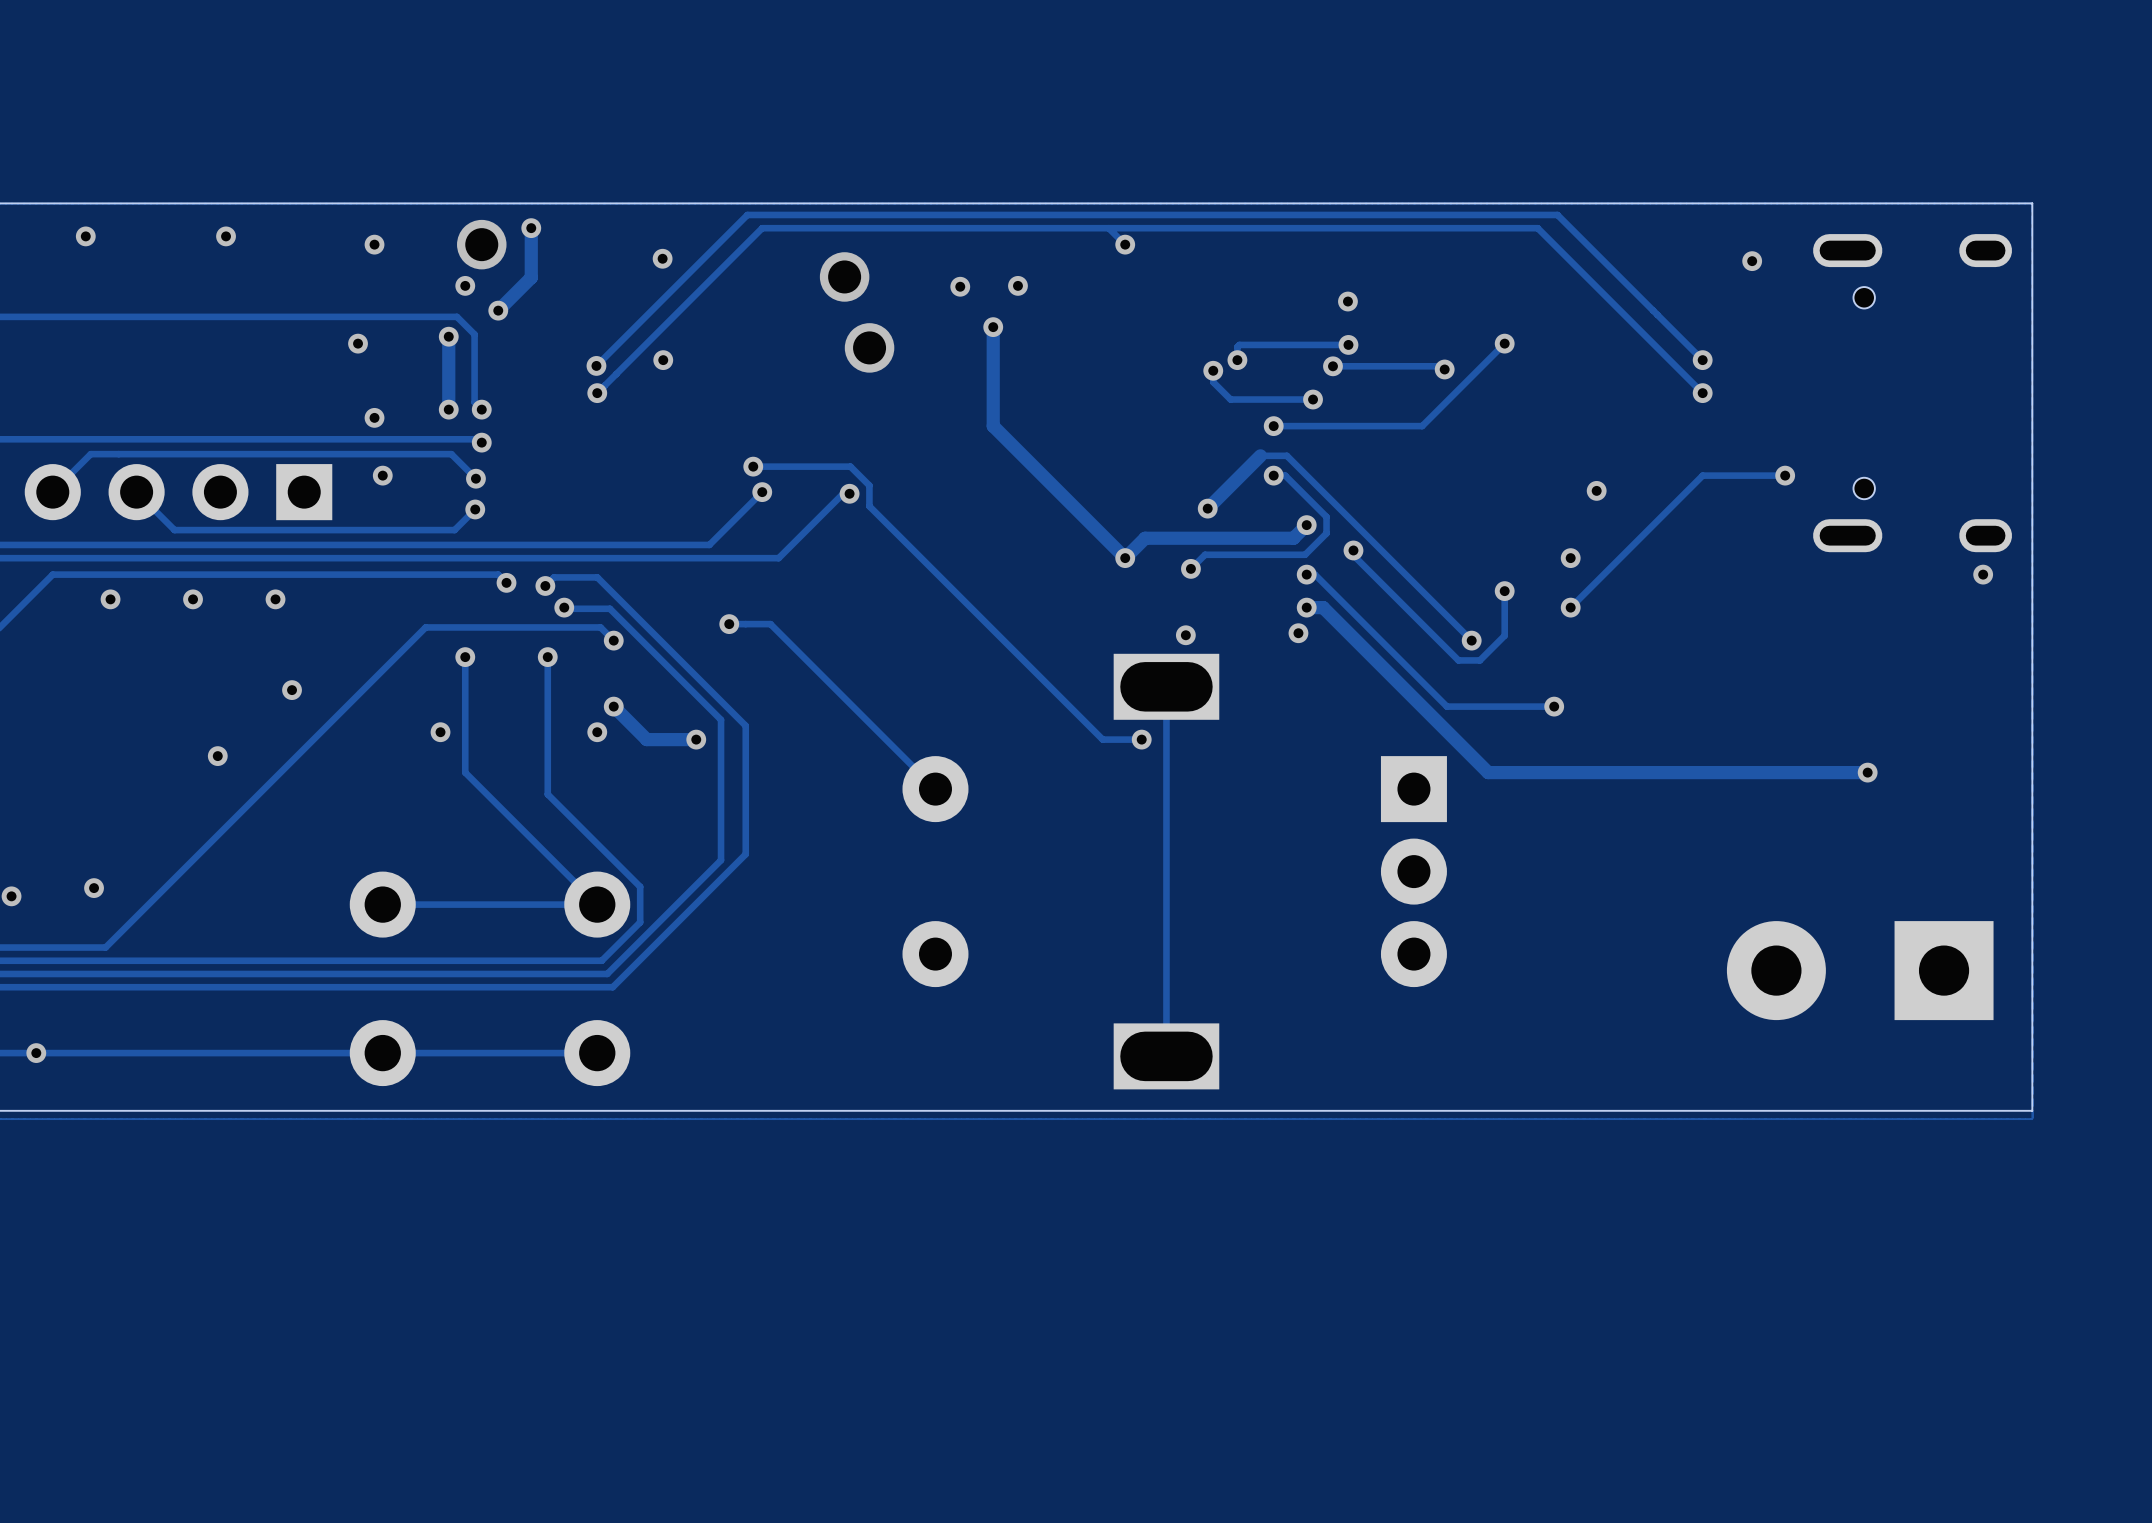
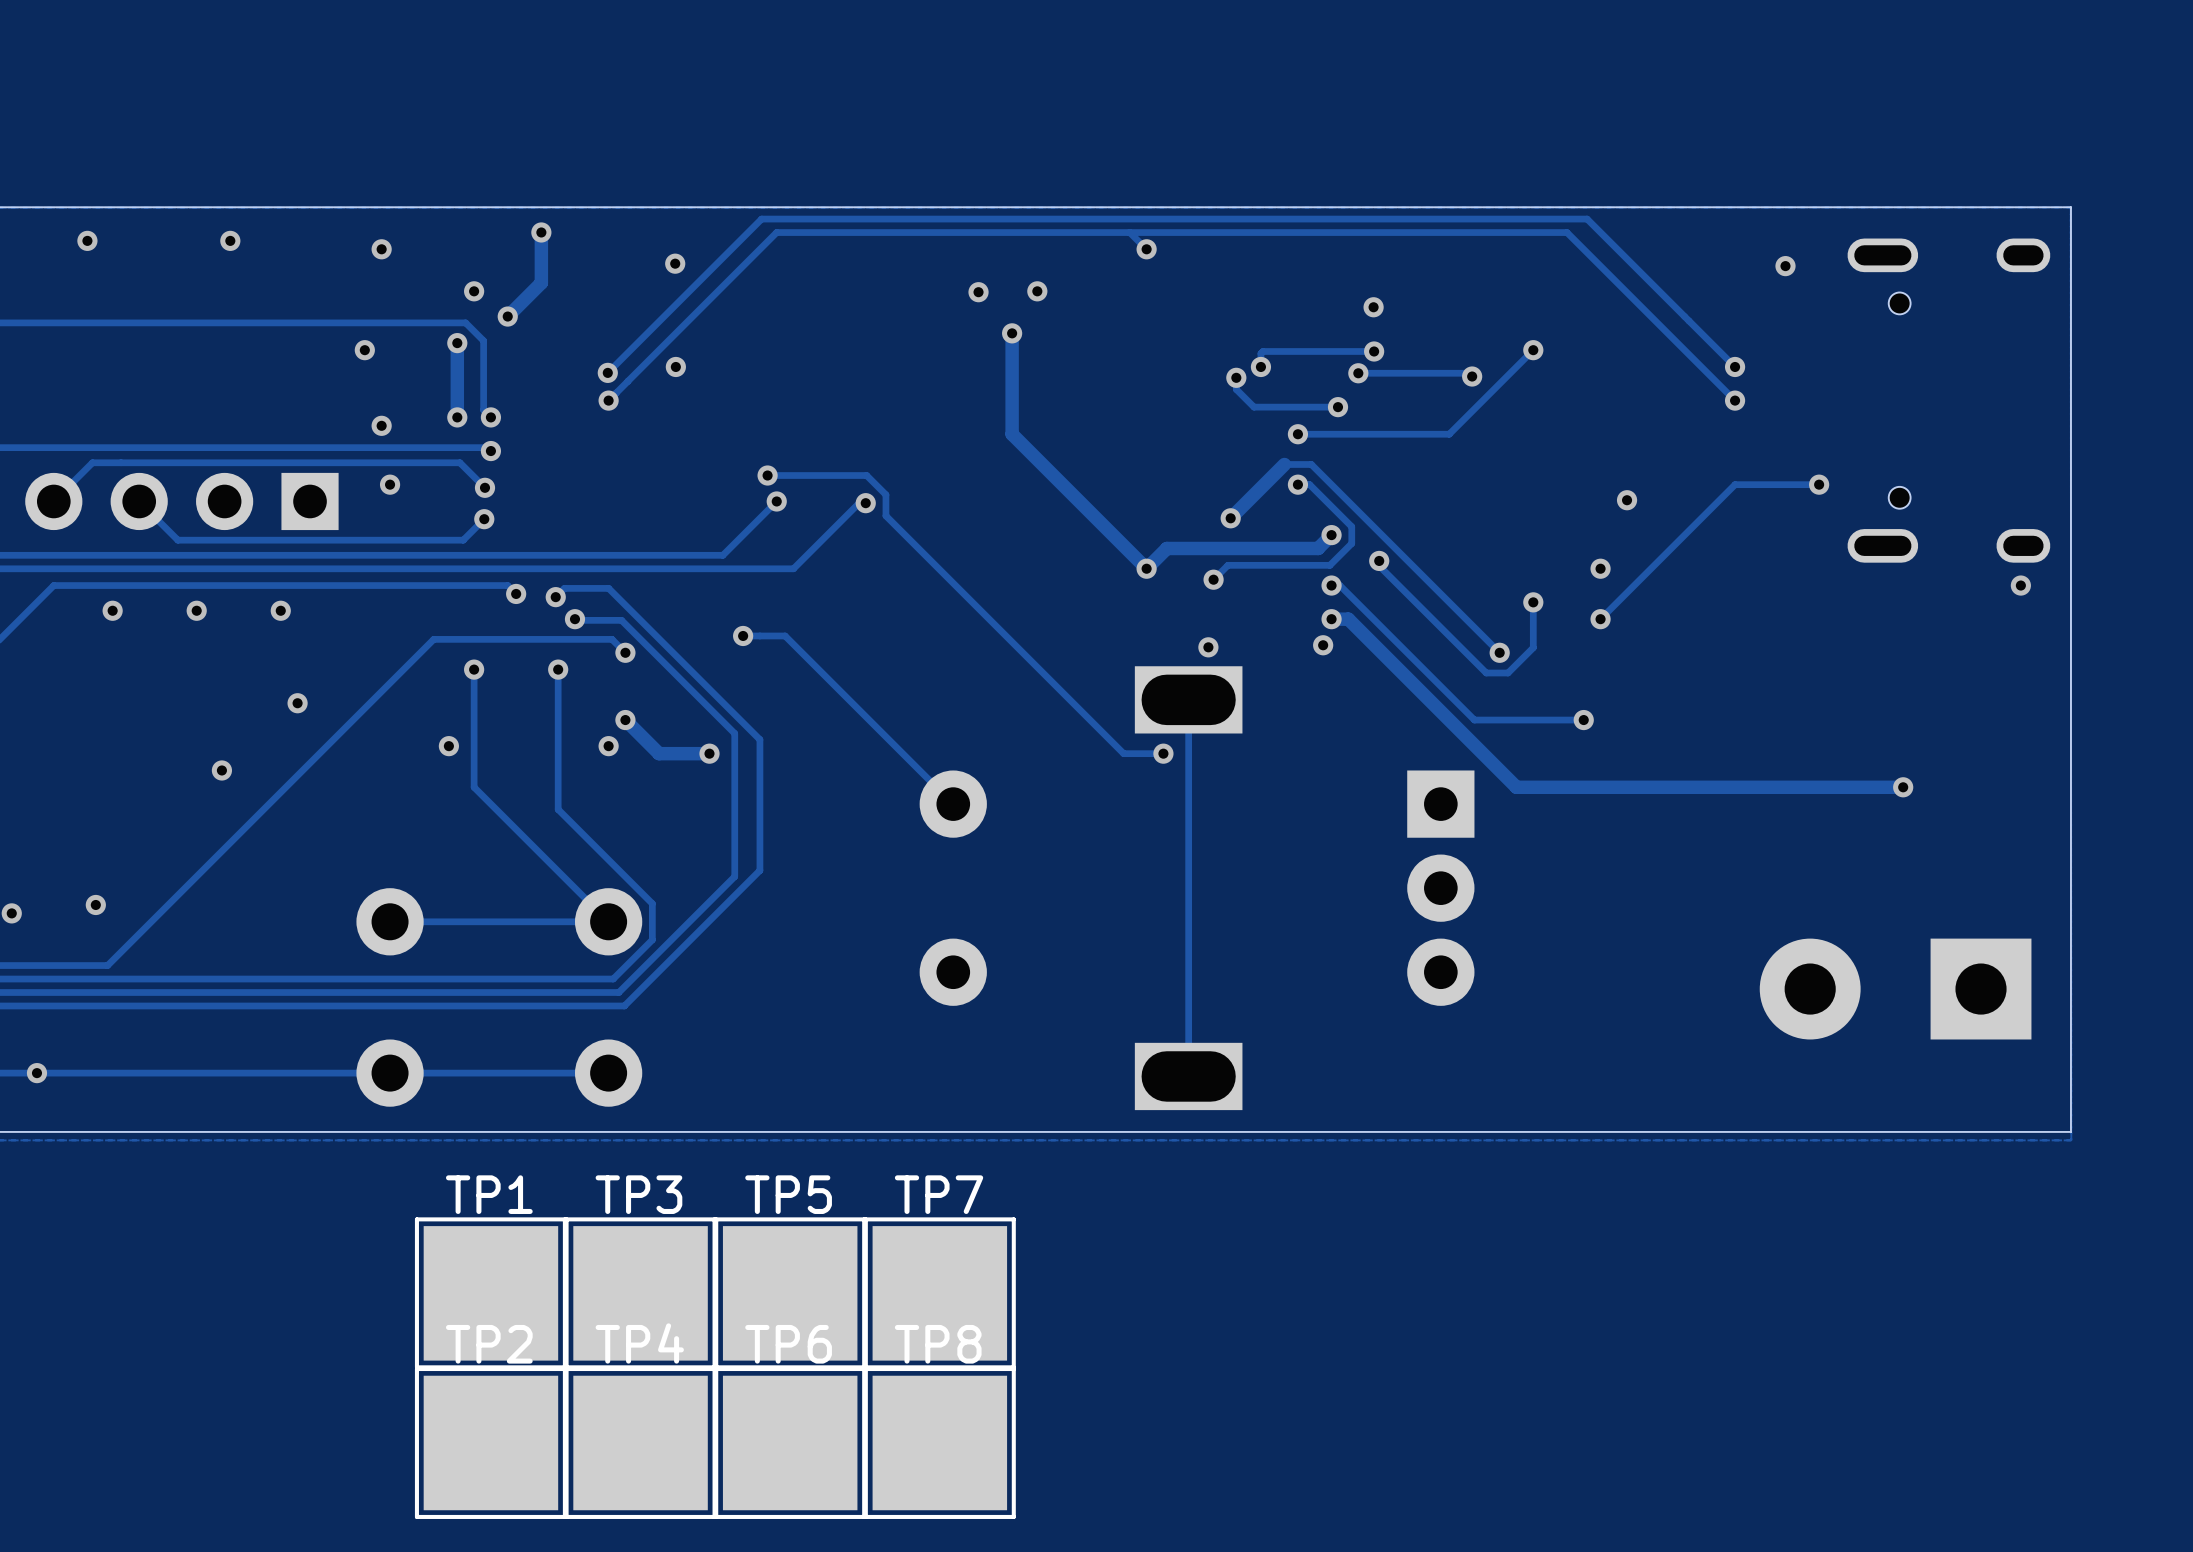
via: (481, 244) -> none
via: (844, 276) -> none
via: (869, 347) -> none
TP1: none -> (490, 1293)
TP3: none -> (640, 1293)
TP5: none -> (790, 1293)
TP7: none -> (939, 1293)
part: none -> (490, 1442)
part: none -> (640, 1442)
part: none -> (790, 1442)
part: none -> (939, 1442)

